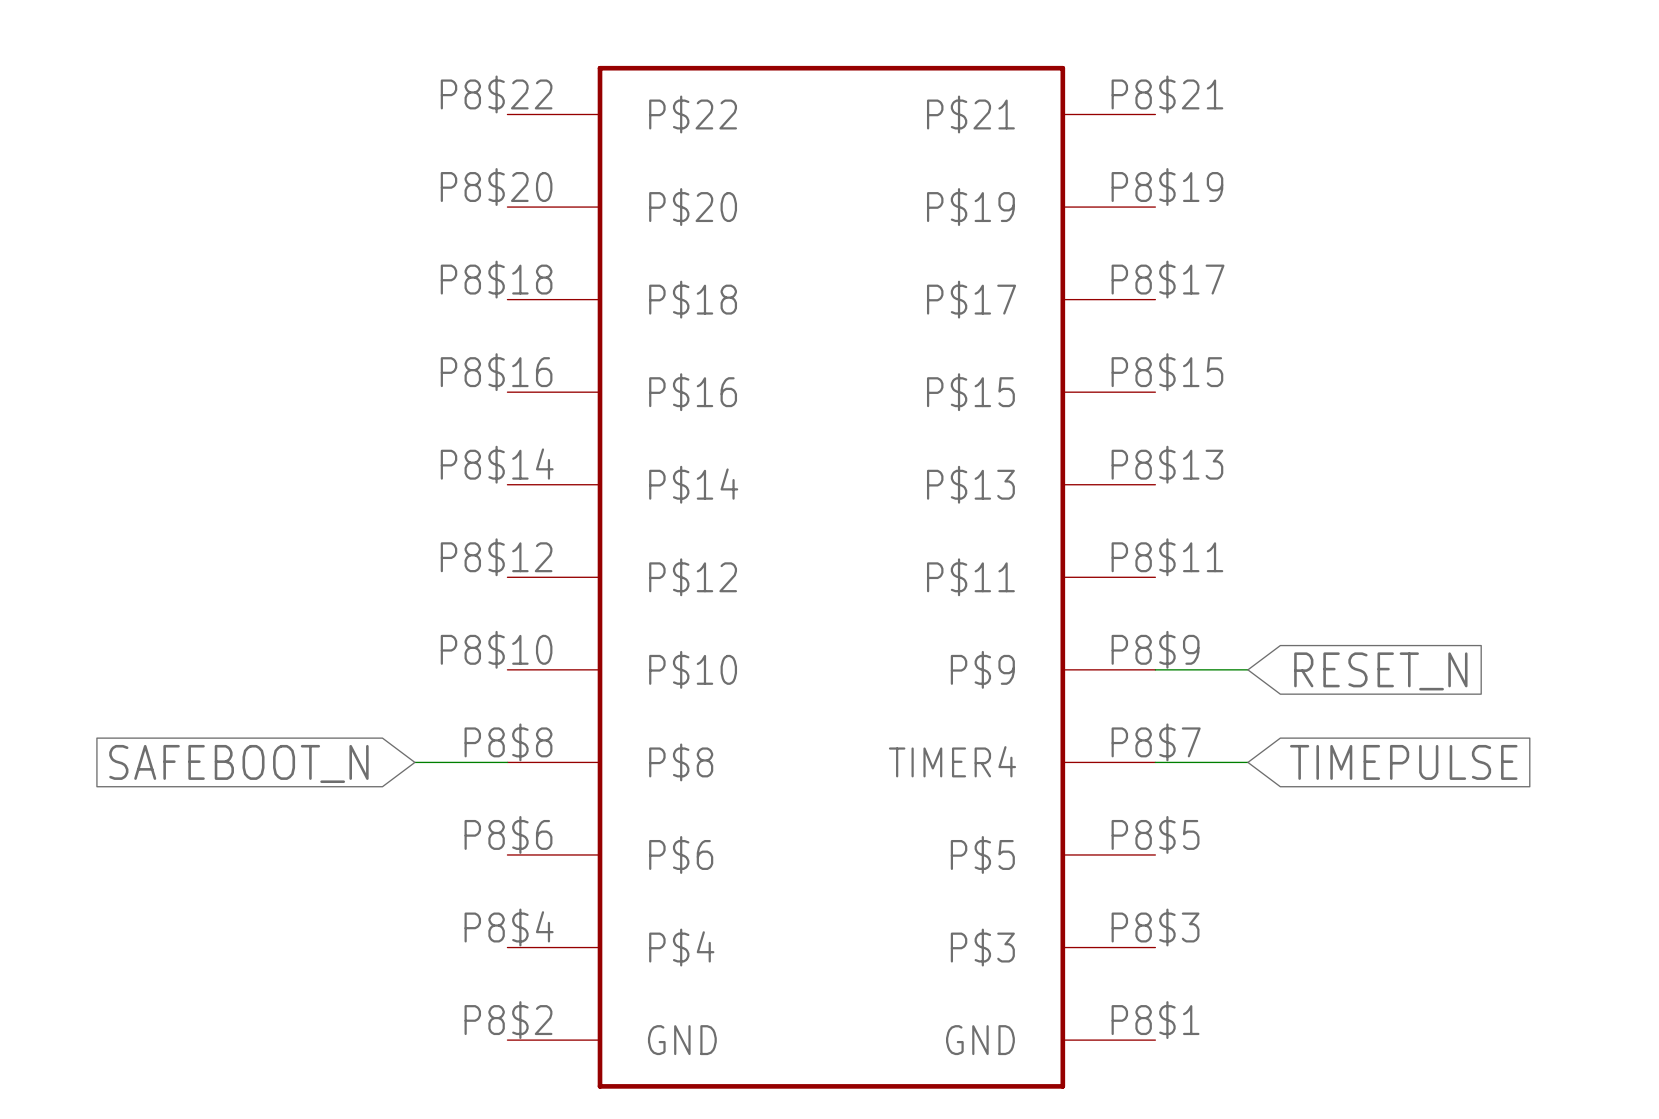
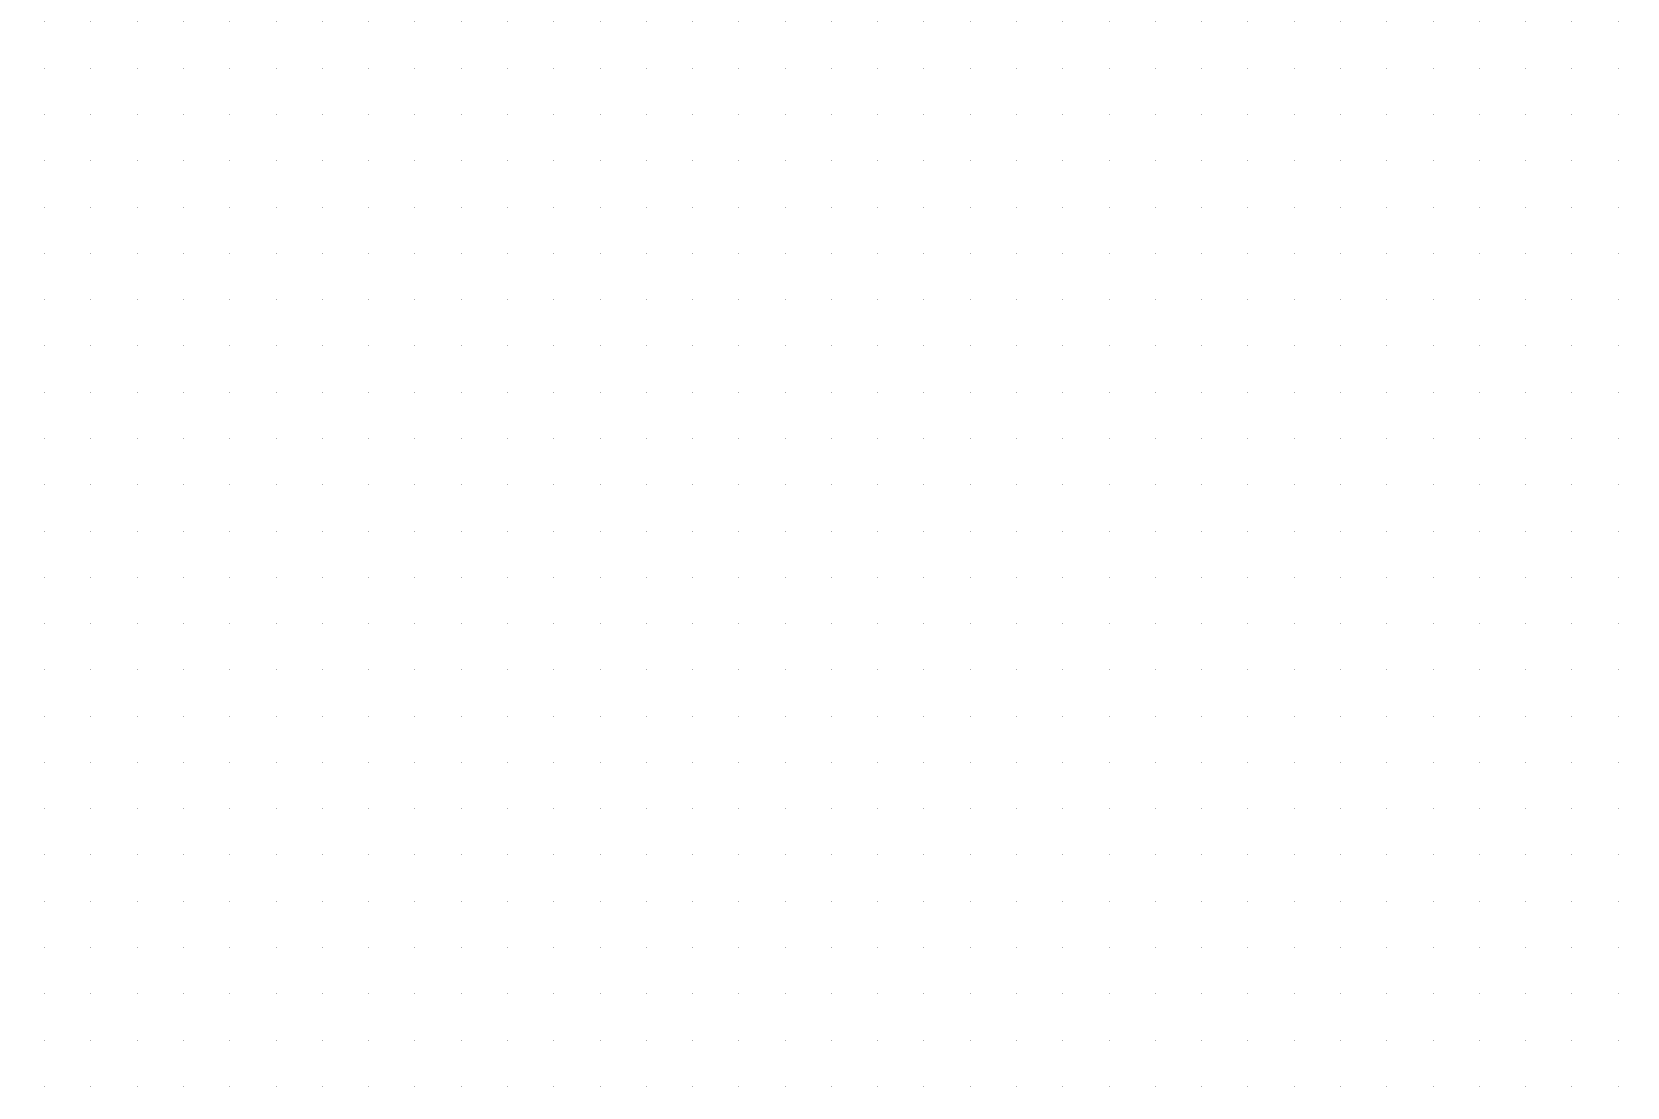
part: (831, 577) -> none
wire: (1155, 669) (1247, 669) -> none
global label: RESET_N (1380, 671) -> none
wire: (414, 762) (507, 762) -> none
wire: (1155, 762) (1247, 762) -> none
global label: TIMEPULSE (1403, 762) -> none
global label: SAFEBOOT_N (238, 763) -> none

